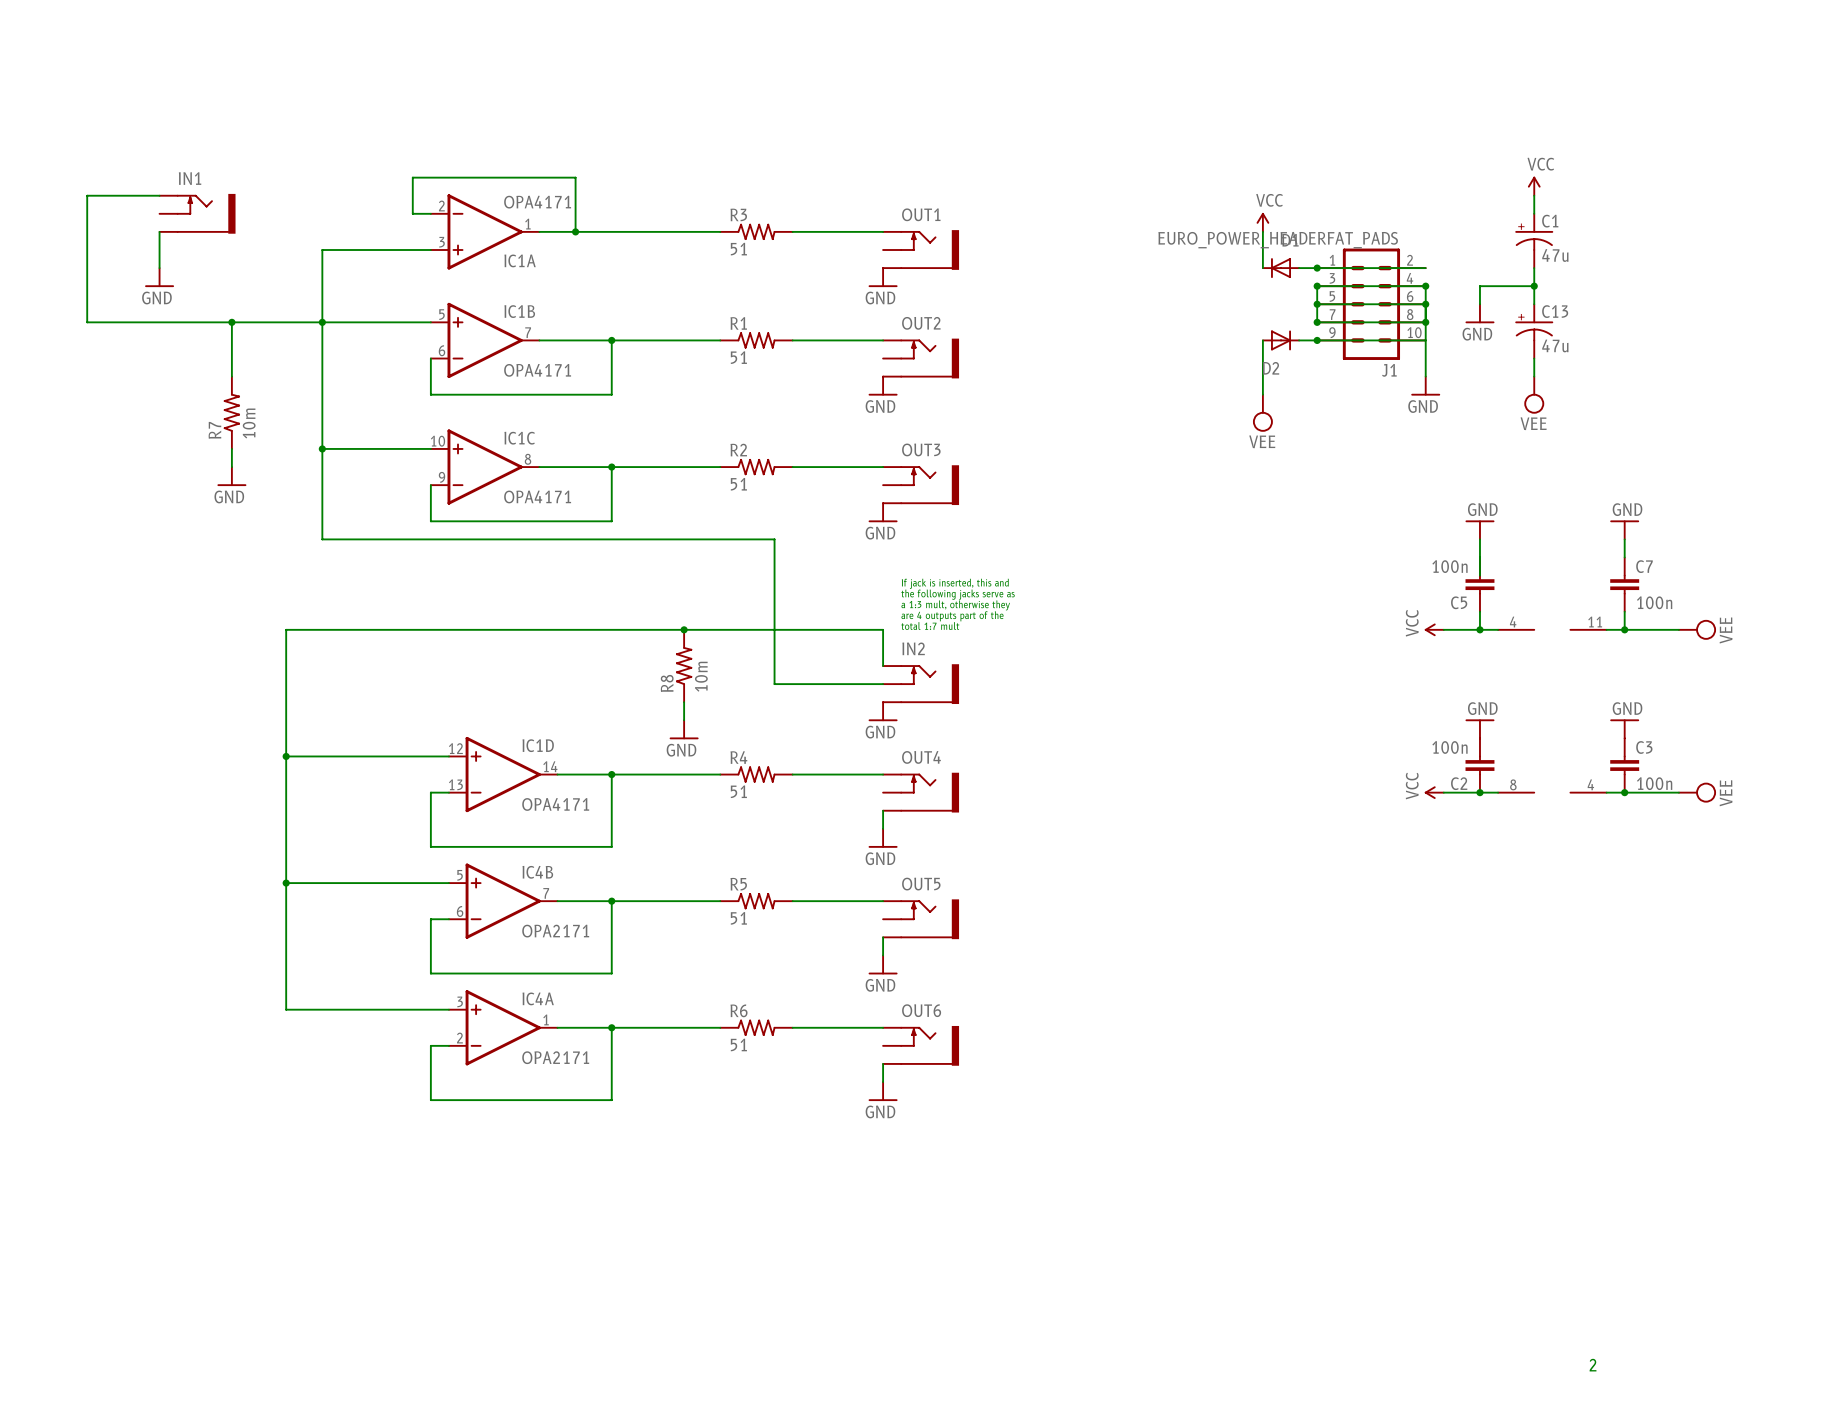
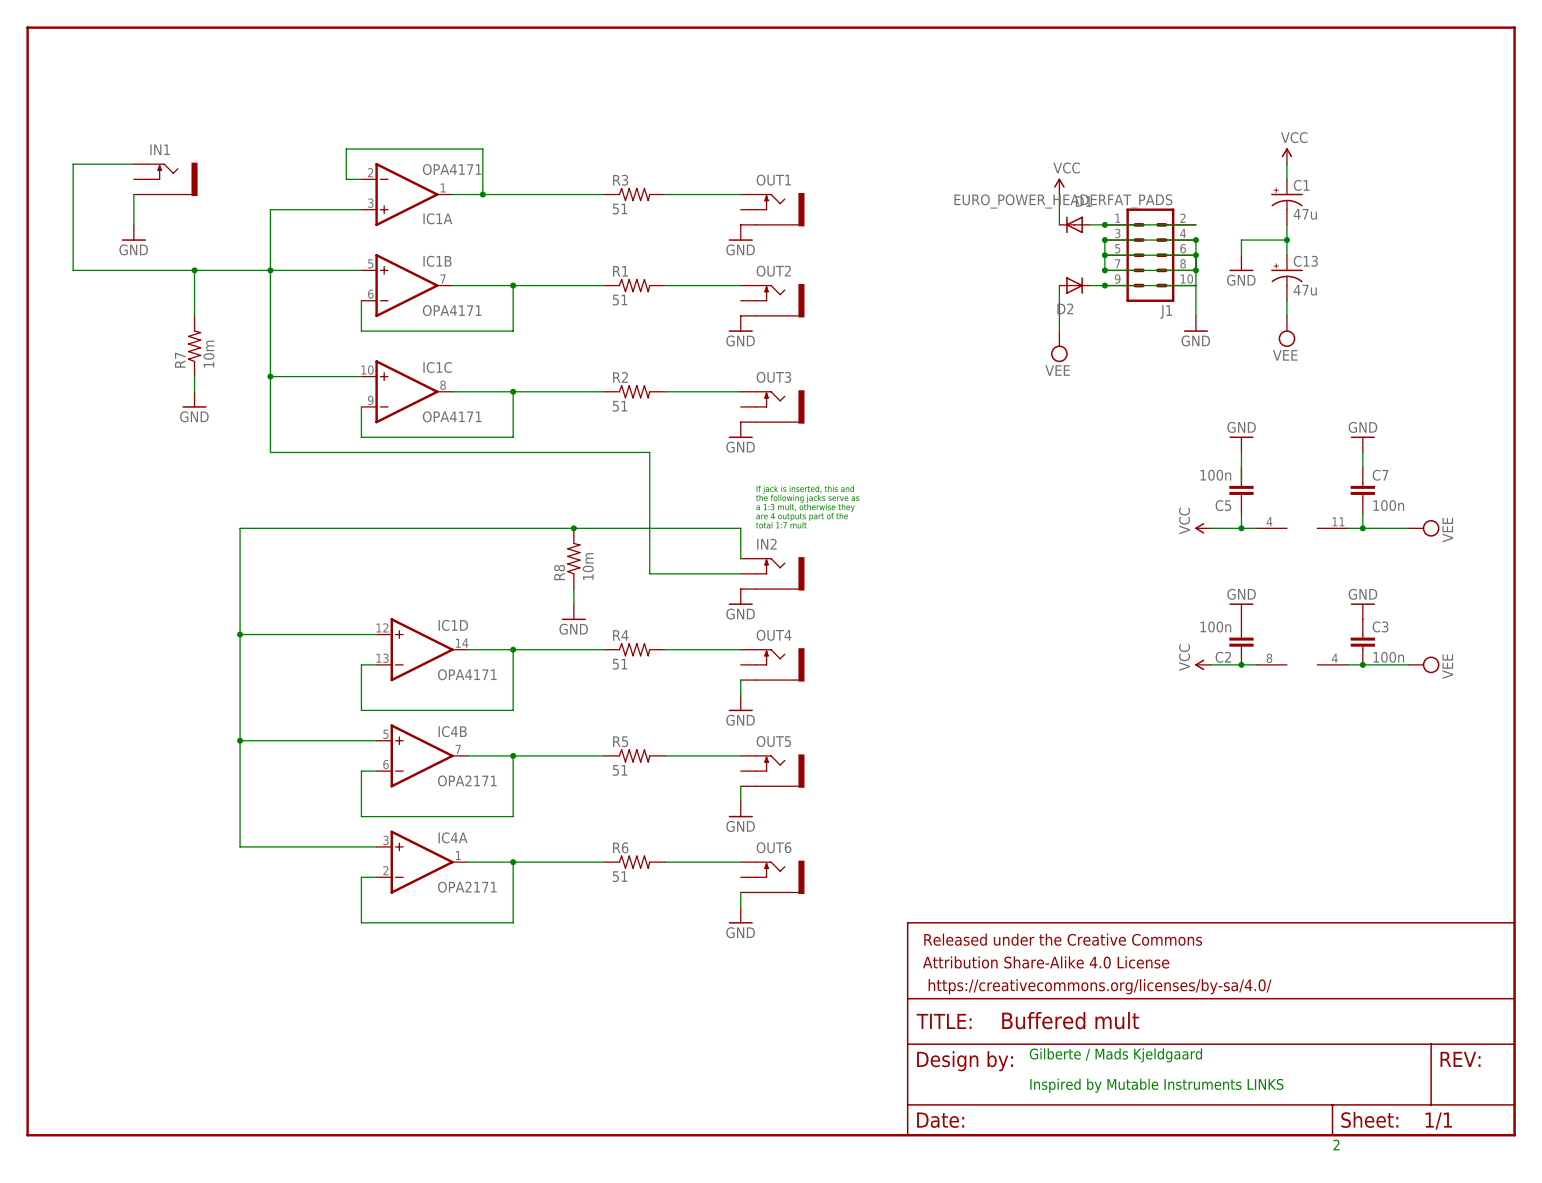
part: none -> (771, 581)
part: none -> (1211, 1029)
text: none -> Gilberte / Mads Kjeldgaard (1115, 1055)
text: none -> Inspired by Mutable Instruments LINKS (1156, 1085)

